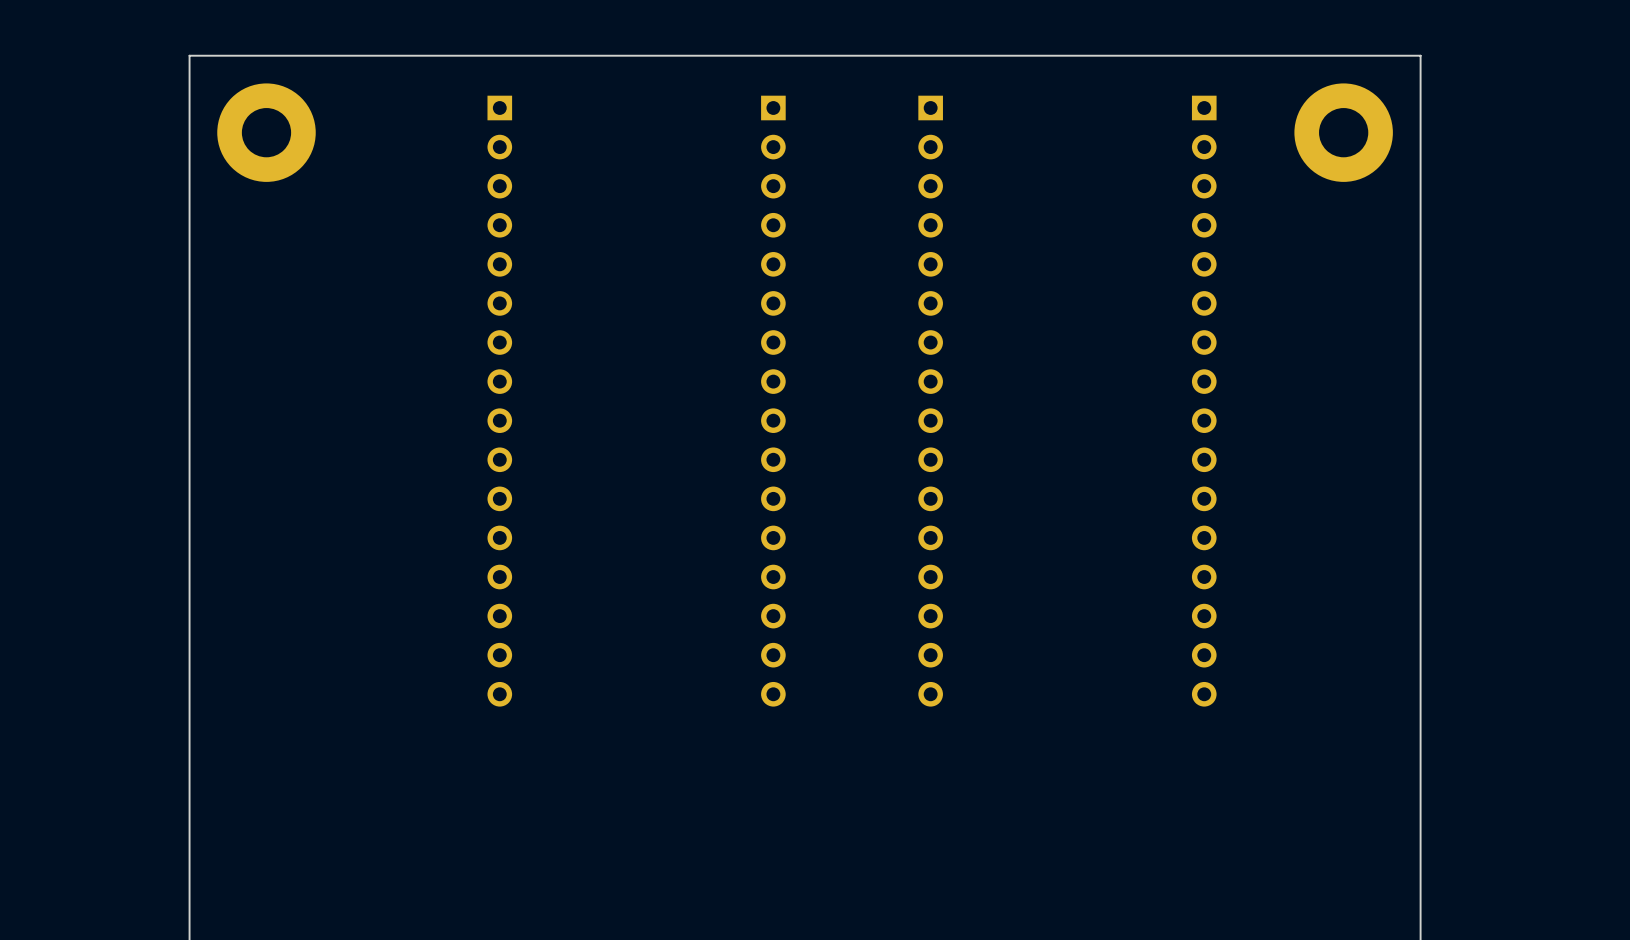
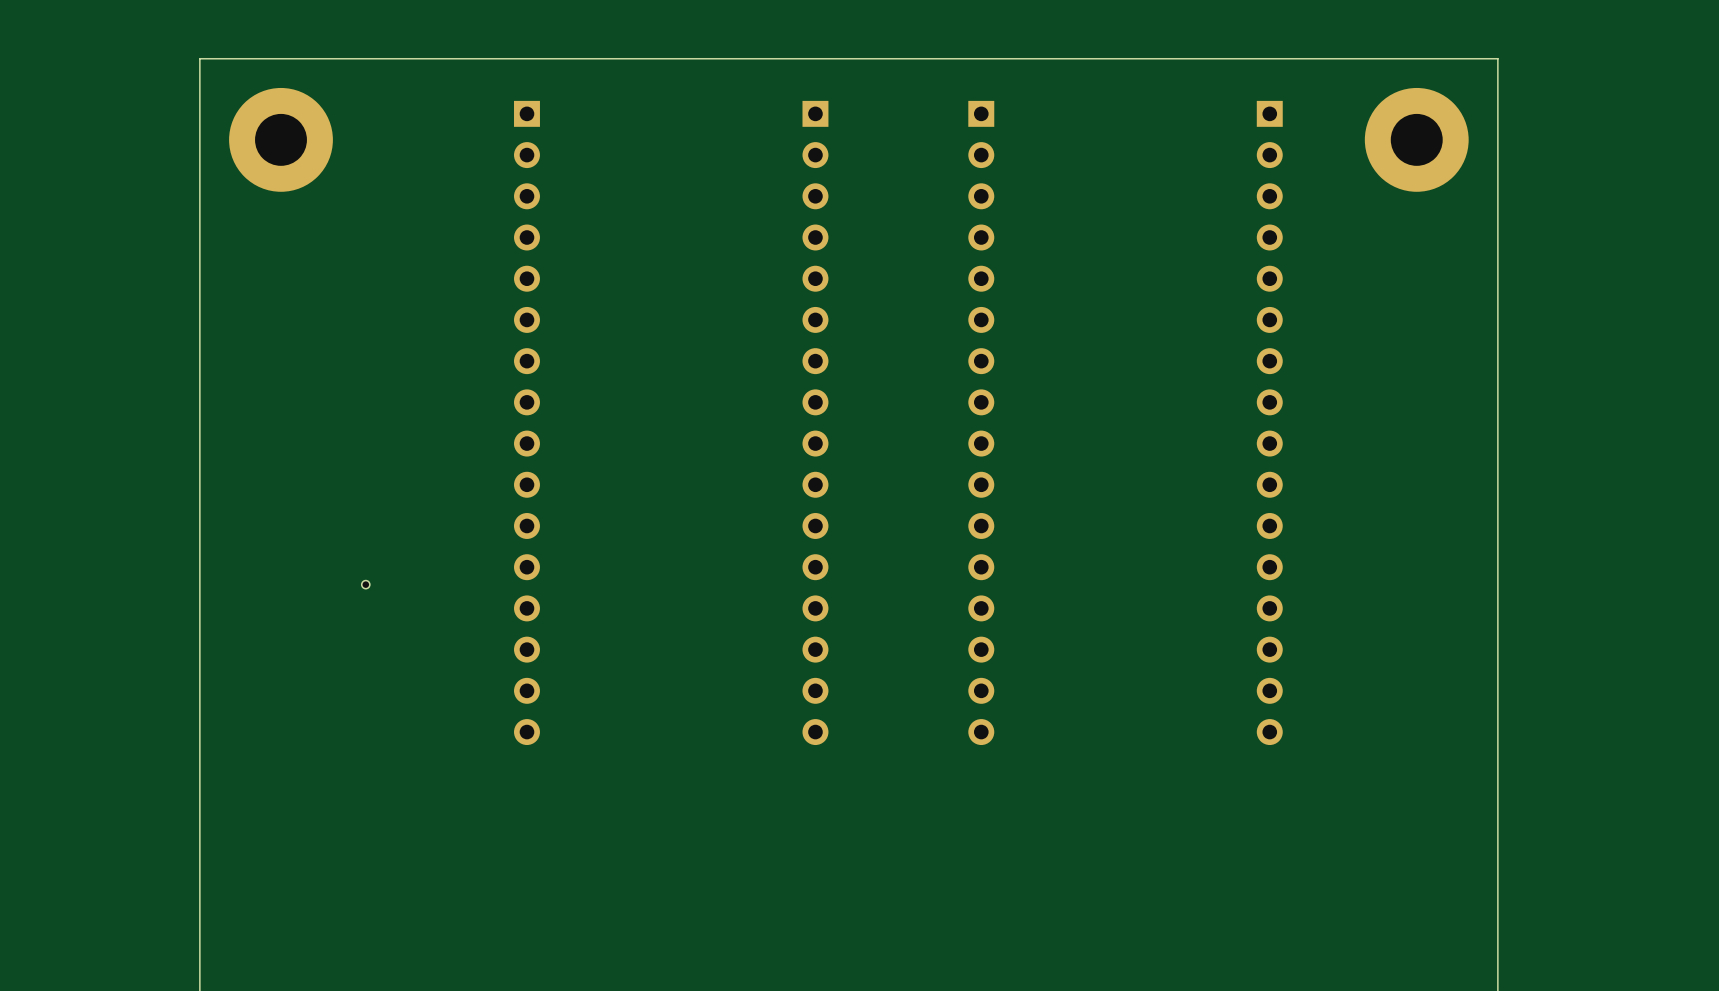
part: none -> (365, 584)

